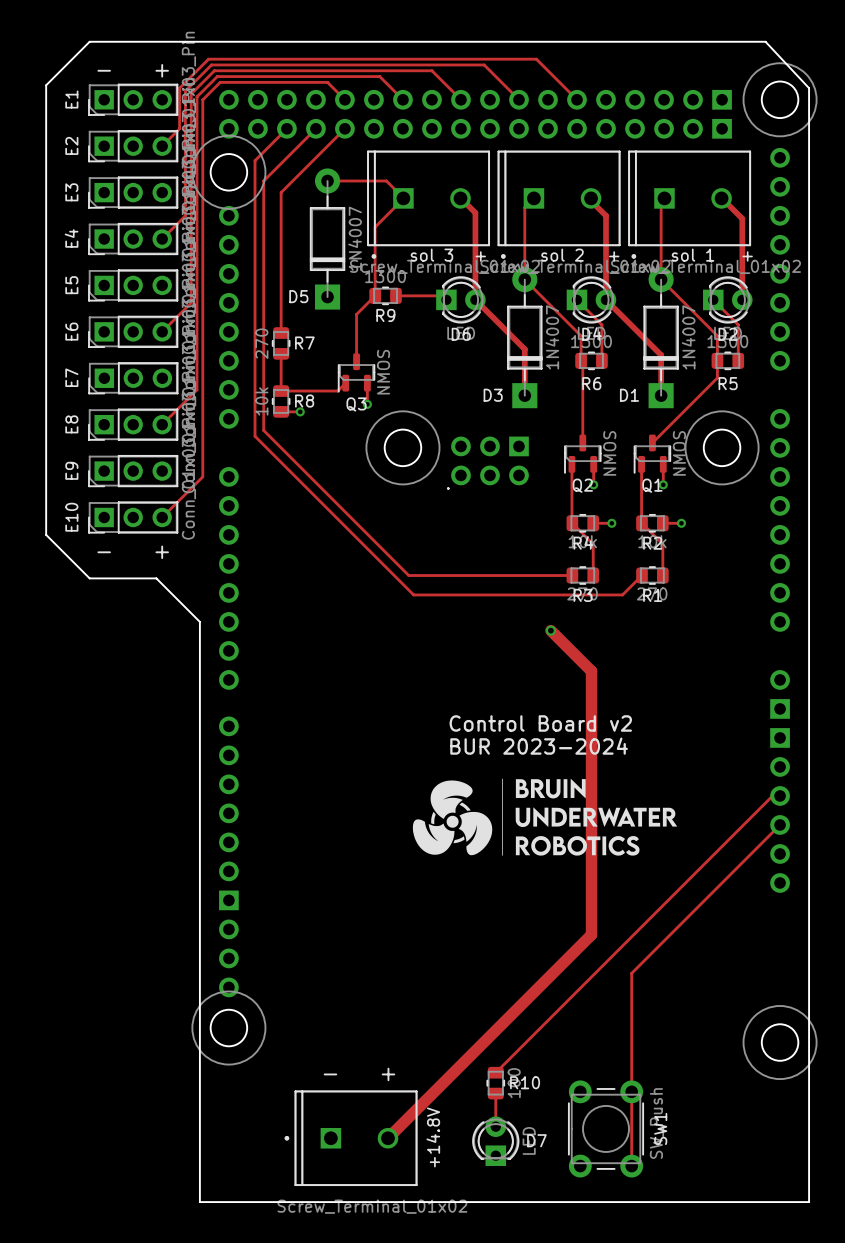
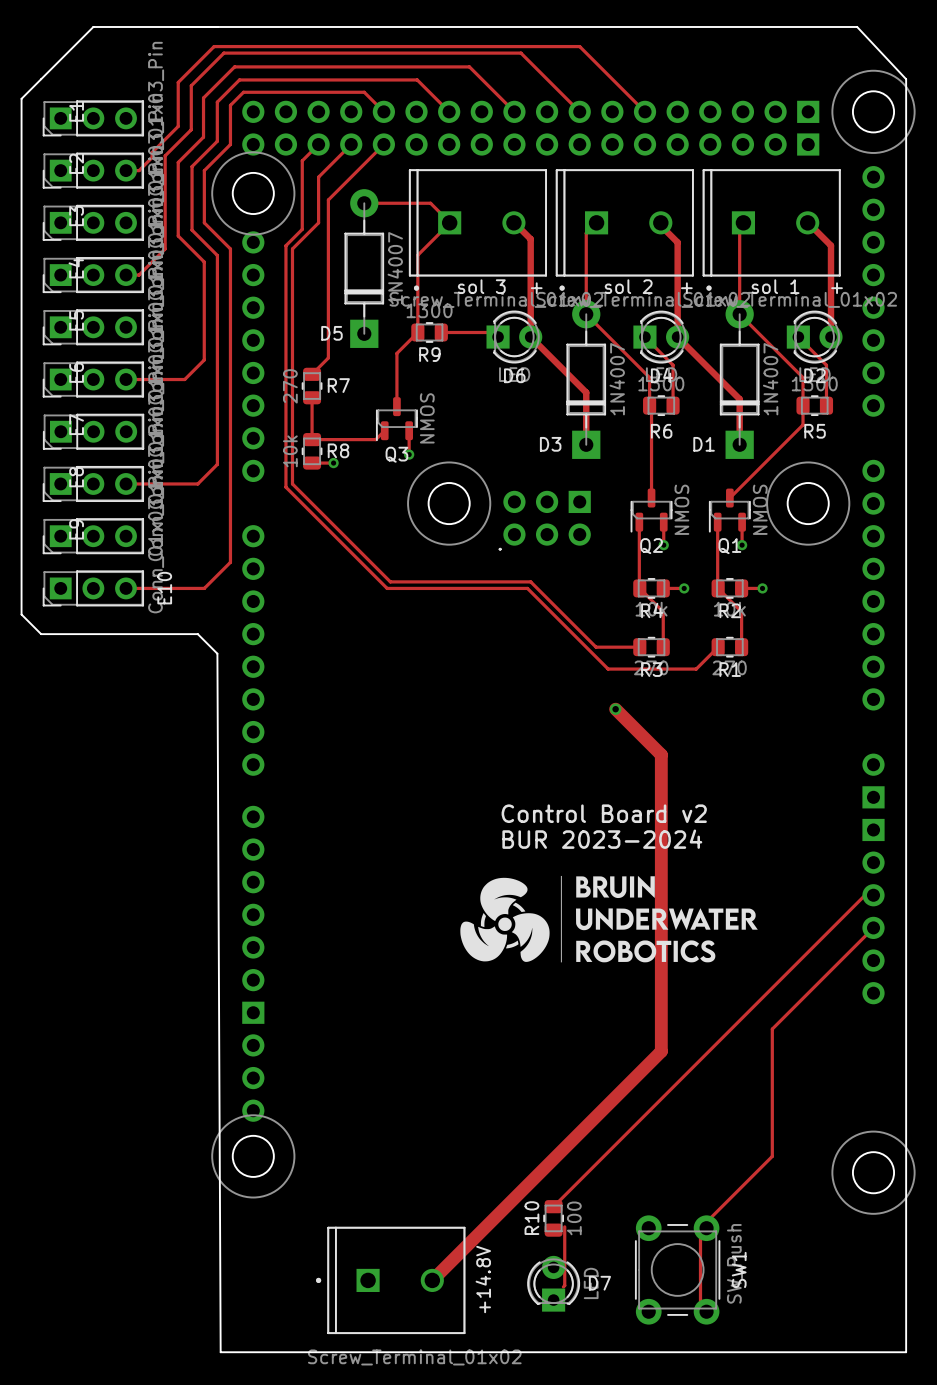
track: (536, 59) (208, 59) (179, 88) (179, 128) (162, 146) -> (599, 66) (579, 46) (214, 46) (178, 82) (178, 126) (152, 152) (152, 157) (139, 170) (126, 170)
line: (162, 64) (162, 76) -> none
track: (484, 64) (211, 64) (185, 91) (185, 152) -> (540, 72) (520, 53) (223, 53) (191, 85) (191, 129) (165, 155) (165, 248) (139, 275) (126, 275)
line: (98, 70) (109, 70) -> none
line: (156, 70) (168, 70) -> none
track: (431, 70) (214, 70) (191, 93) (191, 302) (162, 331) -> (481, 79) (469, 66) (234, 66) (203, 97) (203, 137) (178, 162) (178, 235) (204, 262) (204, 360) (184, 379) (126, 379)
track: (379, 76) (217, 76) (197, 96) (197, 227) -> (423, 85) (417, 79) (239, 79) (217, 102) (217, 141) (192, 166) (192, 230) (217, 255)
board edge: (809, 88) (765, 41) (89, 41) (46, 85) (46, 534) (89, 578) (156, 578) (199, 621) (199, 1202) -> (906, 98) (906, 79) (857, 26) (93, 26) (21, 98) (21, 614) (41, 634) (197, 634) (217, 653) (220, 1352)
track: (208, 93) (202, 99) (202, 476) (162, 517) -> (230, 105) (230, 144) (204, 170)
E1 position: (133, 99) -> (93, 118)
track: (272, 143) (255, 160) (255, 436) (413, 594) (544, 594) -> (302, 160) (302, 229) (285, 245) (285, 487) (387, 588) (527, 588) (608, 669)
E2 position: (133, 146) -> (93, 170)
track: (286, 157) (263, 181) (263, 221) -> (318, 177) (318, 222) (292, 248)
track: (295, 178) (281, 192) (281, 333) -> (328, 199) (328, 358) (312, 374)
E3 position: (133, 192) -> (93, 222)
track: (185, 198) (185, 215) (162, 239) -> (204, 222) (230, 248) (230, 562) (204, 588) (126, 588)
E4 position: (133, 239) -> (93, 275)
E5 position: (133, 285) -> (93, 327)
E6 position: (133, 331) -> (93, 379)
E7 position: (133, 378) -> (93, 431)
track: (197, 389) (162, 424) -> (217, 438) (217, 464) (197, 483) (126, 483)
E8 position: (133, 424) -> (93, 483)
E9 position: (133, 471) -> (93, 536)
E10 name position: E10 (71, 517) -> E10 (164, 588)
E10 position: (133, 517) -> (93, 588)
track: (350, 517) (408, 575) (533, 575) -> (390, 581) (530, 581) (596, 647)
line: (162, 546) (162, 558) -> none
line: (98, 552) (109, 552) -> none
line: (156, 552) (168, 552) -> none
track: (690, 914) (631, 973) (631, 1166) -> (772, 1029) (772, 1156) (700, 1228) (700, 1311)
line: (388, 1068) (388, 1080) -> none
line: (324, 1074) (336, 1074) -> none
line: (382, 1074) (394, 1074) -> none
R10 name rotation: 0° (525, 1082) -> 90° counterclockwise (531, 1218)
R10 name position: R10 (525, 1082) -> R10 (531, 1218)
track: none -> (564, 1226) (563, 1286)
track: (495, 1093) (495, 1126) -> none

